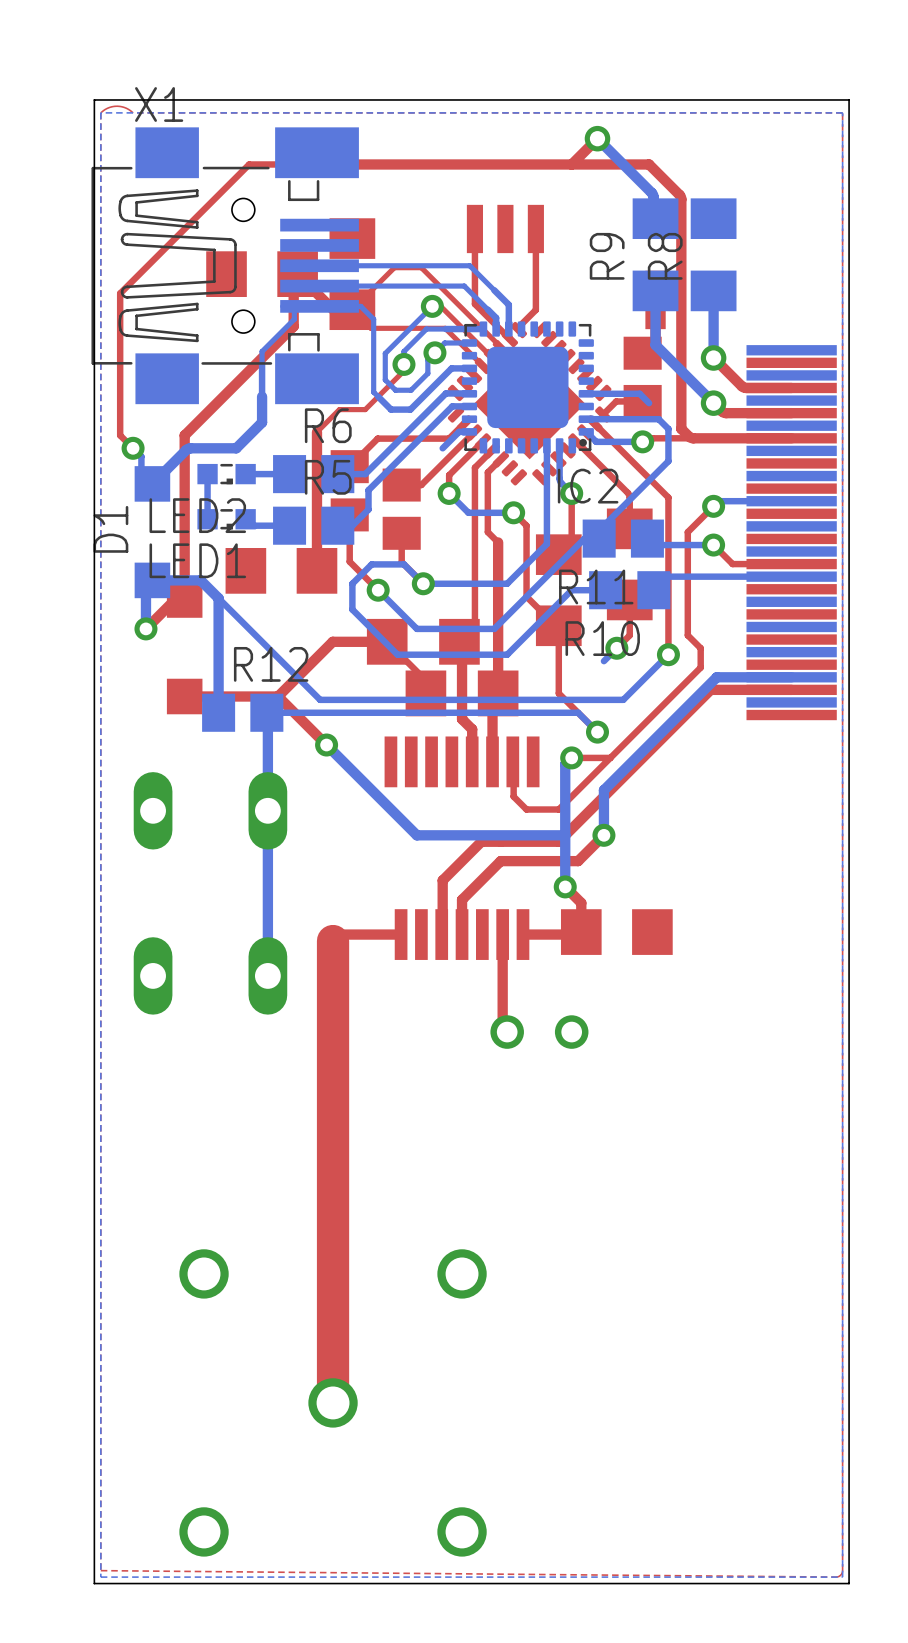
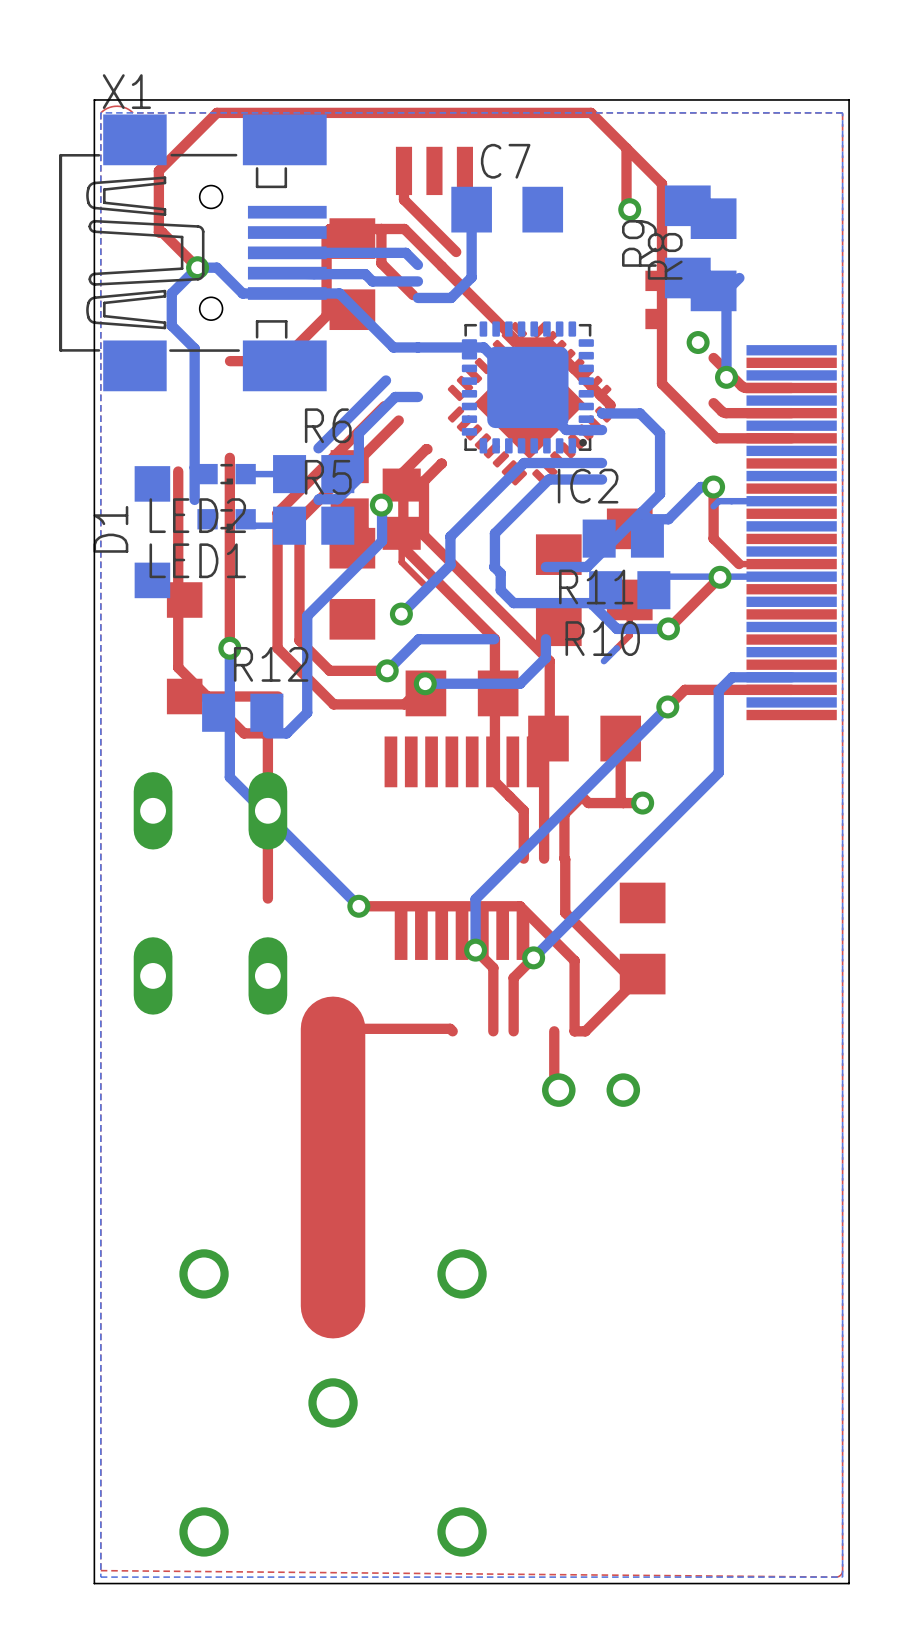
bottom track: (597, 138) (652, 193) (655, 205) (655, 218) -> none
top track: (597, 138) (571, 164) -> none
via: (597, 138) -> none
top track: none -> (626, 148) (626, 206) (629, 209)
top track: none -> (403, 170) (403, 199) (456, 252)
bottom track: none -> (471, 209) (471, 277) (451, 297) (417, 297)
via: none -> (629, 209)
top track: none -> (381, 228) (381, 263) (413, 295)
top track: (474, 228) (474, 304) (509, 338) -> none
part position: (505, 228) -> (434, 170)
top track: (535, 228) (535, 309) (518, 326) (518, 330) -> none
bottom track: none -> (287, 252) (405, 252) (417, 264)
R9 position: (655, 254) -> (687, 241)
X1 position: (225, 265) -> (193, 252)
bottom track: (319, 265) (469, 265) (508, 304) (508, 329) -> none
via: none -> (197, 267)
bottom track: none -> (287, 273) (365, 274) (372, 281) (417, 281)
part: (262, 274) -> none
bottom track: none -> (739, 278) (726, 290) (726, 377)
bottom track: (319, 286) (464, 286) (496, 317) (496, 329) -> none
bottom track: (655, 290) (655, 345) (713, 403) -> none
bottom track: (713, 290) (713, 357) -> none
bottom track: (282, 306) (360, 306) (373, 319) (373, 392) (391, 409) (410, 409) (451, 368) (469, 368) -> none
bottom track: (294, 306) (294, 319) (262, 351) (262, 422) (236, 448) (188, 448) (152, 483) (141, 472) (141, 456) (133, 448) -> none
bottom track: (432, 306) (385, 353) (385, 379) (395, 390) (411, 390) (427, 373) (427, 359) (444, 343) (469, 343) -> none
top track: (432, 306) (440, 306) (491, 357) -> none
via: (432, 306) -> none
top track: (352, 309) (371, 328) (445, 328) (482, 365) -> none
top track: (352, 309) (394, 267) (421, 267) (500, 348) -> none
top track: (352, 309) (333, 309) (297, 274) (293, 284) (293, 326) (184, 435) (184, 600) (174, 600) (145, 628) -> none
bottom track: (483, 329) (426, 329) (403, 351) (403, 364) -> none
via: none -> (698, 342)
via: (434, 352) -> none
via: (713, 357) -> none
top track: none -> (230, 361) (281, 361) (326, 315) (326, 232) (329, 228) (404, 228) (518, 342) (547, 342) (610, 406)
top track: (403, 364) (403, 370) (365, 409) (339, 409) (316, 432) (316, 570) -> none
via: (403, 364) -> none
part: (642, 377) -> none
via: none -> (726, 377)
bottom track: none -> (386, 380) (318, 448)
bottom track: (469, 393) (445, 393) (365, 474) (337, 474) -> none
bottom track: (586, 393) (639, 393) (649, 403) -> none
bottom track: none -> (417, 396) (395, 396) (358, 433) (358, 477) (337, 499) (318, 499)
top track: (642, 401) (616, 401) (603, 414) -> none
via: (713, 403) -> none
top track: none -> (384, 406) (277, 512) (277, 648) (333, 704) (404, 704) (425, 683)
bottom track: (469, 406) (452, 406) (368, 490) (368, 509) (352, 525) (337, 525) -> none
bottom track: none -> (602, 413) (640, 413) (660, 433) (660, 494) (587, 566) (545, 566)
bottom track: (586, 419) (658, 419) (668, 428) (668, 461) (603, 525) (603, 533) (599, 538) -> none
top track: none -> (398, 420) (299, 519) (299, 640) (329, 670) (387, 670)
top track: (464, 423) (449, 438) (377, 438) (349, 466) -> none
top track: (594, 423) (668, 497) (668, 654) -> none
bottom track: none -> (602, 430) (566, 430) (483, 347) (393, 347) (339, 293) (242, 293) (216, 267) (197, 267) (171, 293) (171, 325) (194, 348) (194, 499)
bottom track: (469, 431) (459, 431) (442, 448) -> none
bottom track: (586, 431) (596, 441) (642, 441) -> none
top track: (473, 432) (421, 485) (401, 485) -> none
top track: (693, 438) (652, 438) (649, 441) (642, 441) -> none
top track: (693, 438) (681, 428) (681, 198) (649, 164) (249, 164) (120, 293) (120, 435) (133, 448) -> none
top track: (716, 438) (693, 438) -> (716, 438) (662, 383) (662, 183) (591, 112) (216, 112) (158, 170) (158, 232) (162, 232) (197, 267)
top track: (482, 441) (449, 475) (449, 493) -> none
top track: (576, 441) (628, 494) (629, 528) -> none
via: (642, 441) -> none
bottom track: (546, 445) (546, 544) (507, 583) (423, 583) (403, 564) (371, 564) (352, 583) (352, 609) (397, 654) (507, 654) (571, 590) (603, 590) -> none
bottom track: (559, 445) (559, 480) (571, 493) -> none
via: (133, 448) -> none
top track: none -> (427, 449) (403, 472) (403, 547) (494, 639) (494, 781) (523, 810) (523, 858)
top track: (491, 450) (474, 467) (474, 626) (459, 641) (462, 644) (462, 719) (472, 729) (472, 761) -> none
top track: none -> (229, 457) (229, 648)
top track: (500, 459) (487, 472) (487, 532) (498, 542) (498, 693) (492, 699) (492, 761) -> none
top track: none -> (441, 463) (423, 481) (423, 535) (549, 661) (549, 737) (544, 742) (544, 858)
bottom track: none -> (602, 463) (524, 463) (450, 536) (450, 565) (401, 614)
top track: none -> (178, 471) (178, 667) (244, 733) (267, 733) (267, 898)
bottom track: (207, 474) (207, 519) -> none
bottom track: none -> (602, 479) (548, 479) (494, 533) (494, 566) (500, 573) (500, 590) (513, 603) (591, 603) (616, 628) (668, 628)
bottom track: none -> (713, 487) (700, 487) (668, 519) (649, 519) (642, 512)
bottom track: (449, 493) (468, 512) (513, 512) -> none
via: (449, 493) -> none
top track: (571, 493) (571, 541) (558, 554) -> none
via: (571, 493) -> none
bottom track: none -> (381, 505) (382, 541) (307, 616) (307, 712) (286, 733) (267, 733)
via: none -> (381, 505)
top track: (713, 506) (687, 532) (687, 635) (700, 648) (700, 667) (558, 809) (526, 809) (513, 796) (512, 761) -> none
via position: (713, 506) -> (713, 487)
top track: (513, 512) (526, 525) (526, 596) (555, 625) (558, 625) (558, 693) (597, 732) -> none
via: (513, 512) -> none
top track: (349, 514) (349, 561) (378, 590) -> none
bottom track: (599, 538) (584, 538) (494, 628) (416, 628) (378, 590) -> none
bottom track: (647, 538) (653, 545) (713, 545) -> none
top track: (713, 545) (732, 564) (739, 564) -> (713, 487) (713, 538) (739, 564)
via: (713, 545) -> none
C7 side: top (281, 570) -> bottom (507, 209)
top track: none -> (720, 577) (668, 628)
via: none -> (720, 577)
part: none -> (352, 583)
via: (423, 583) -> none
via: (378, 590) -> none
bottom track: (218, 598) (320, 699) (623, 699) (668, 654) -> none
bottom track: (218, 598) (200, 580) (152, 580) (145, 586) (145, 628) -> none
bottom track: (218, 598) (218, 712) -> none
via: none -> (401, 614)
via: (145, 628) -> none
bottom track: none -> (494, 639) (418, 639) (387, 670)
bottom track: none -> (545, 639) (545, 657) (520, 683) (425, 683)
part position: (423, 641) -> (584, 738)
bottom track: none -> (229, 648) (229, 777) (358, 906)
via: none -> (229, 648)
via: (616, 648) -> none
via position: (668, 654) -> (668, 628)
via: none -> (387, 670)
bottom track: (732, 677) (716, 677) (603, 790) (603, 835) -> (732, 677) (718, 690) (718, 772) (533, 957)
via: none -> (425, 683)
top track: (710, 689) (558, 841) (481, 841) (442, 880) (441, 934) -> (710, 689) (684, 689) (667, 706)
top track: (425, 693) (425, 680) (387, 641) (332, 641) (278, 696) (326, 745) -> none
bottom track: none -> (667, 706) (475, 899) (475, 950)
via: none -> (667, 706)
bottom track: (597, 732) (578, 712) (266, 712) (267, 975) -> none
via: (597, 732) -> none
top track: none -> (620, 738) (620, 800) (623, 803)
bottom track: (326, 745) (416, 835) (565, 835) -> none
via: (326, 745) -> none
bottom track: (571, 757) (565, 764) (565, 886) -> none
via: (571, 757) -> none
top track: (610, 757) (571, 757) -> none
top track: none -> (642, 803) (588, 803) (582, 796) (564, 814) (565, 912) (626, 974) (642, 974) (585, 1031) (574, 1031) (574, 960) (520, 906) (358, 906)
via: none -> (642, 803)
top track: (603, 835) (578, 861) (500, 861) (462, 899) (462, 934) -> none
via: (603, 835) -> none
top track: (565, 886) (581, 902) (581, 932) (578, 934) (522, 934) -> none
via: (565, 886) -> none
via: none -> (358, 906)
part rotation: 0° (616, 932) -> 90° clockwise (642, 938)
top track: (401, 934) (339, 934) (334, 937) (333, 1028) -> (452, 1031) (450, 1028) (333, 1028)
top track: (502, 934) (502, 1024) (507, 1032) -> none
top track: none -> (475, 950) (493, 967) (493, 1031)
via: none -> (475, 950)
top track: none -> (533, 957) (513, 977) (513, 1031)
via: none -> (533, 957)
top track width: thin (333, 1028) (333, 1306) -> thick (333, 1028) (333, 1306)
top track: none -> (554, 1031) (554, 1085) (558, 1090)
part position: (539, 1032) -> (591, 1090)
top track: (333, 1306) (333, 1402) -> none

